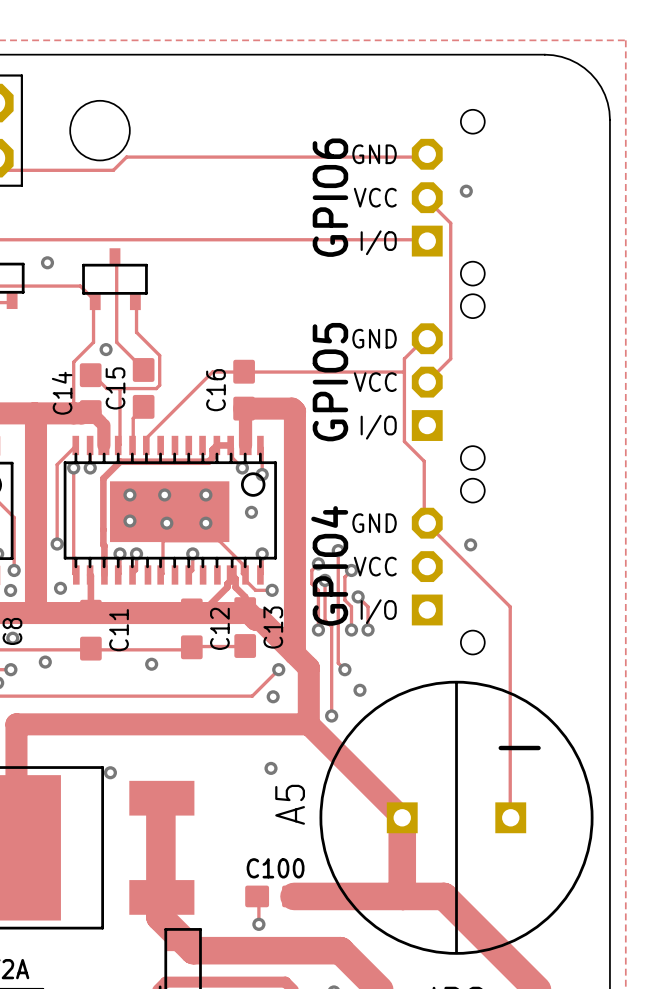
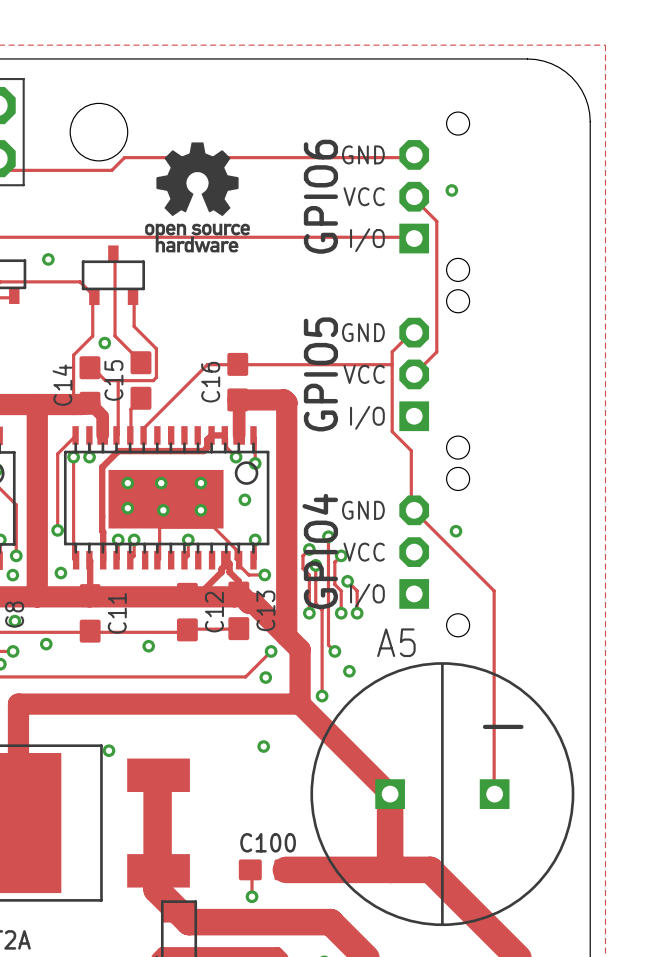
drawing: none -> [145, 142, 250, 253]
A5 name rotation: 0° (290, 804) -> 90° clockwise (396, 642)
A5 name position: A5 (290, 804) -> A5 (396, 642)

